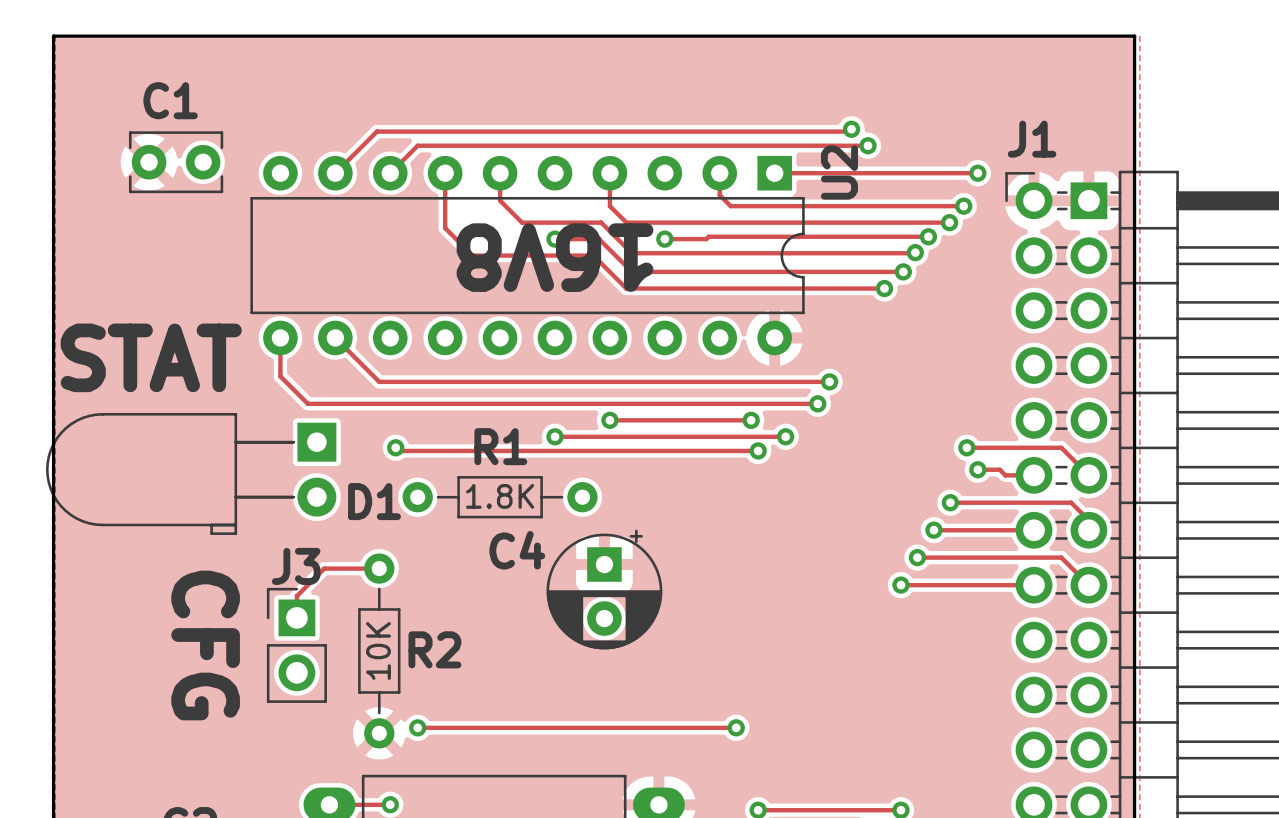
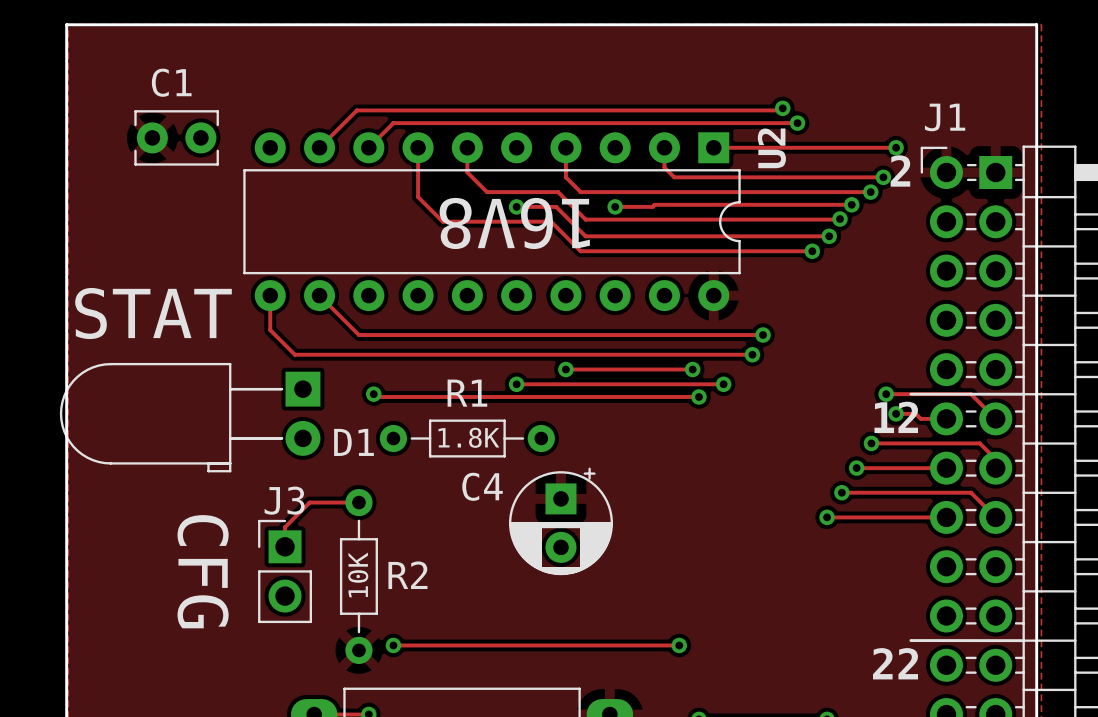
text: none -> 2 (900, 170)
line: none -> (910, 394) (1023, 394)
text: none -> 12 (896, 417)
line: none -> (910, 640) (1023, 640)
text: none -> 22 (895, 663)

